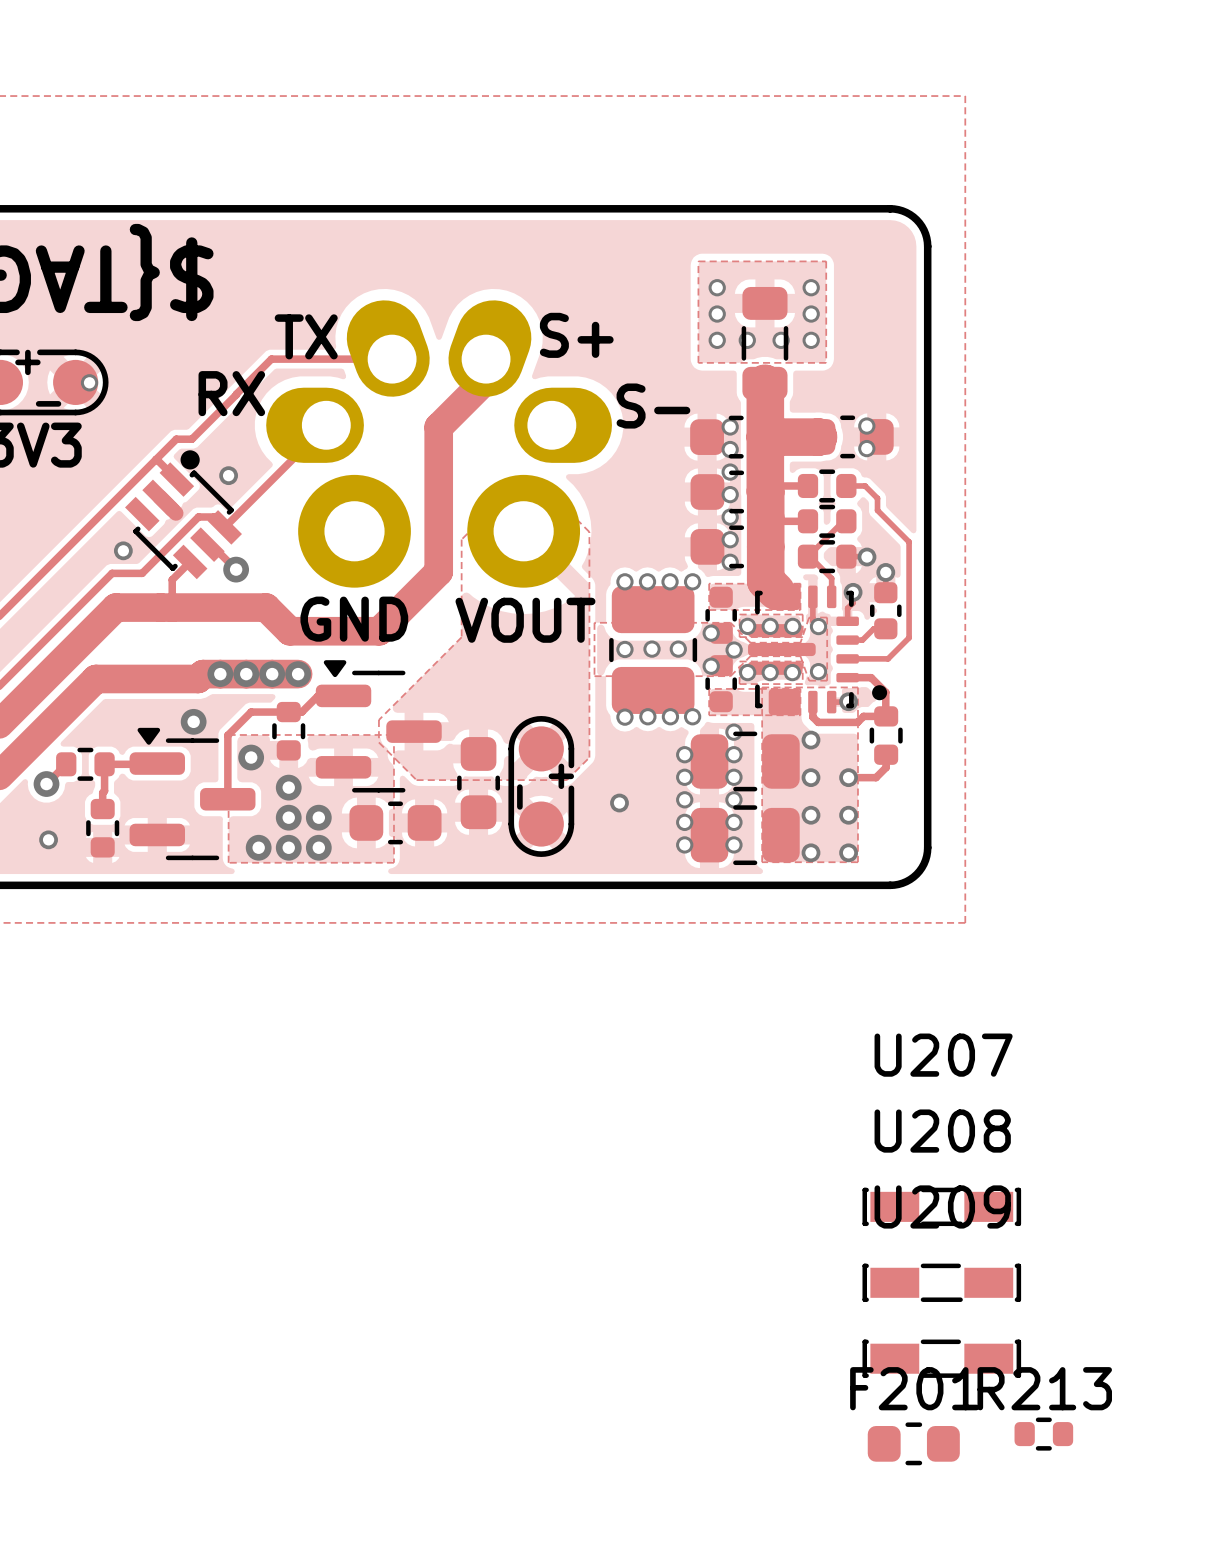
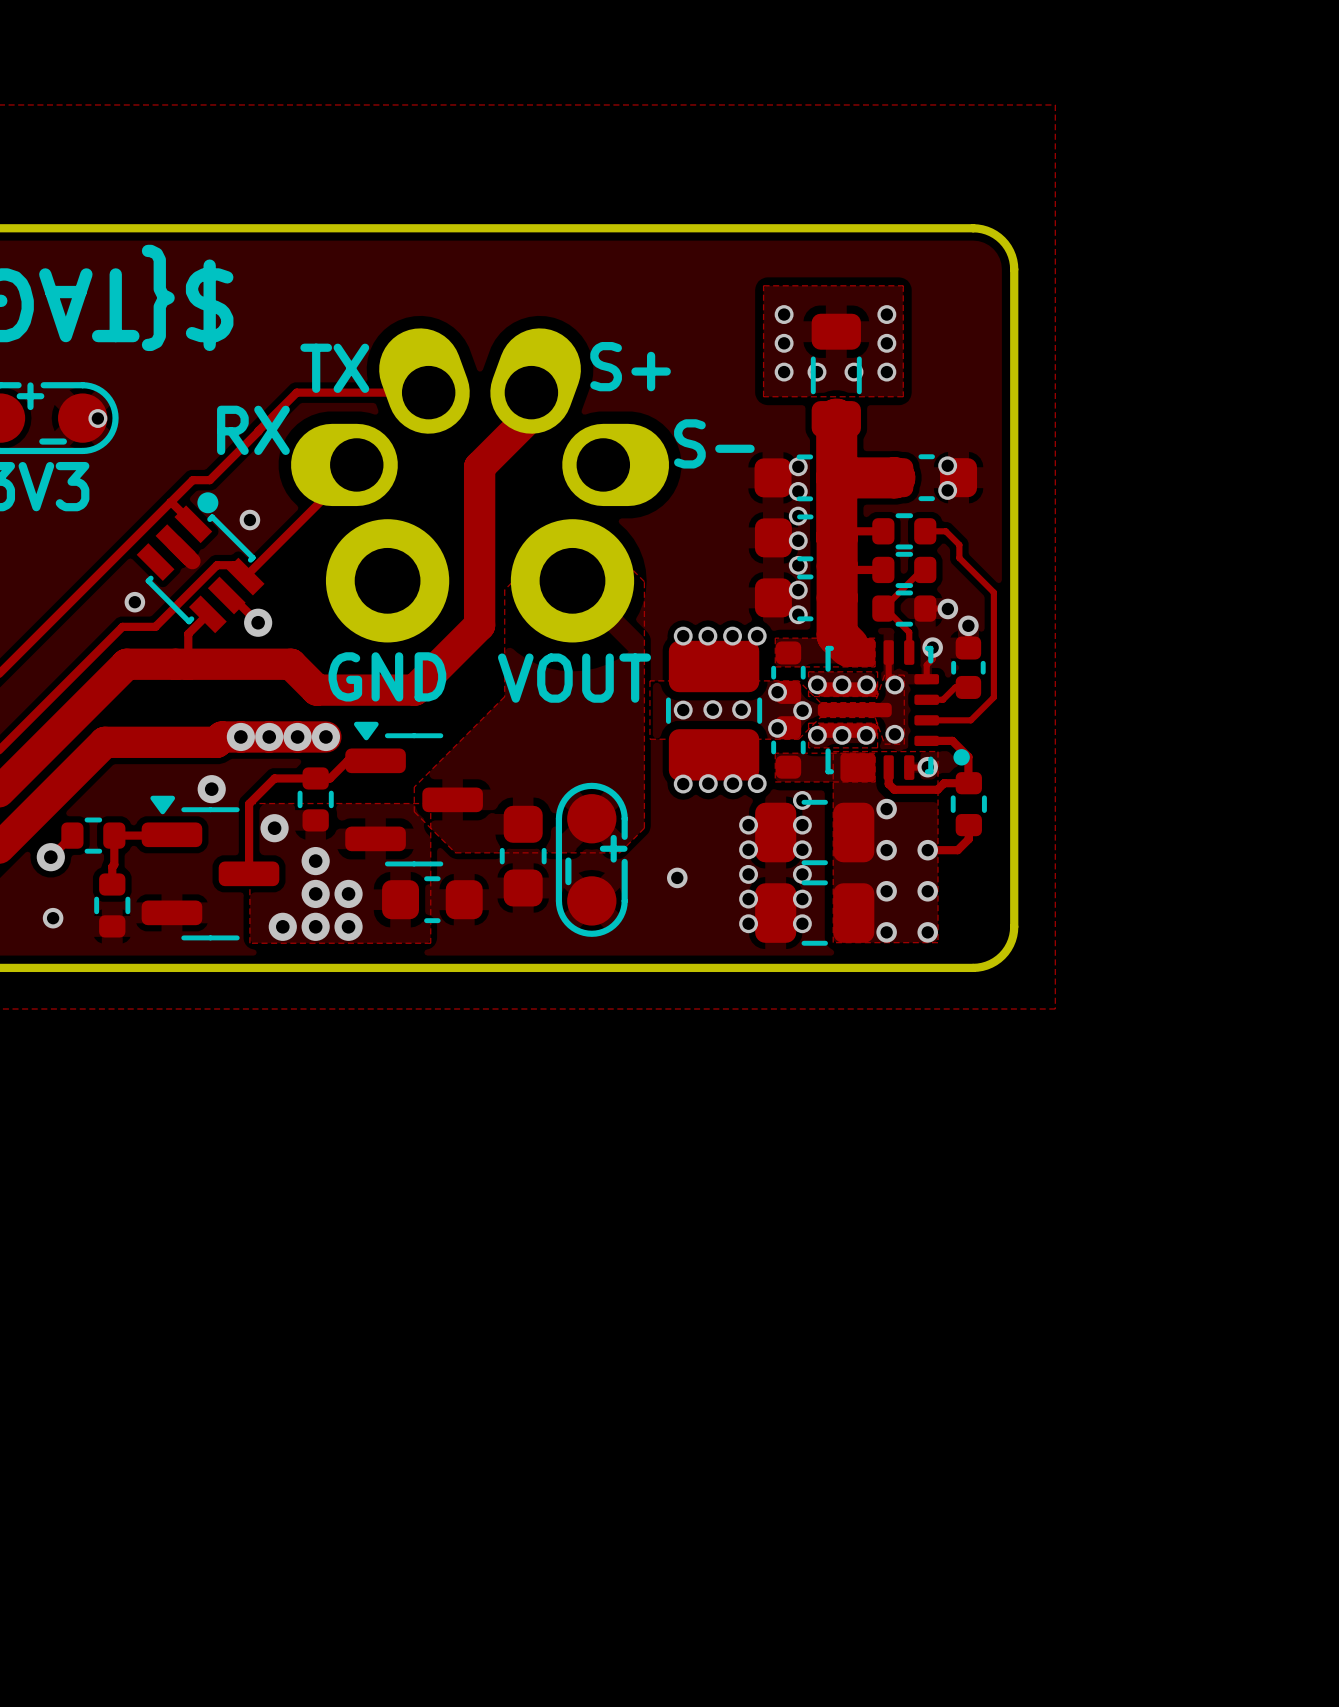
U207: (941, 1206) -> none
U208: (941, 1282) -> none
U209: (941, 1358) -> none
R213: (1043, 1434) -> none
F201: (913, 1443) -> none

